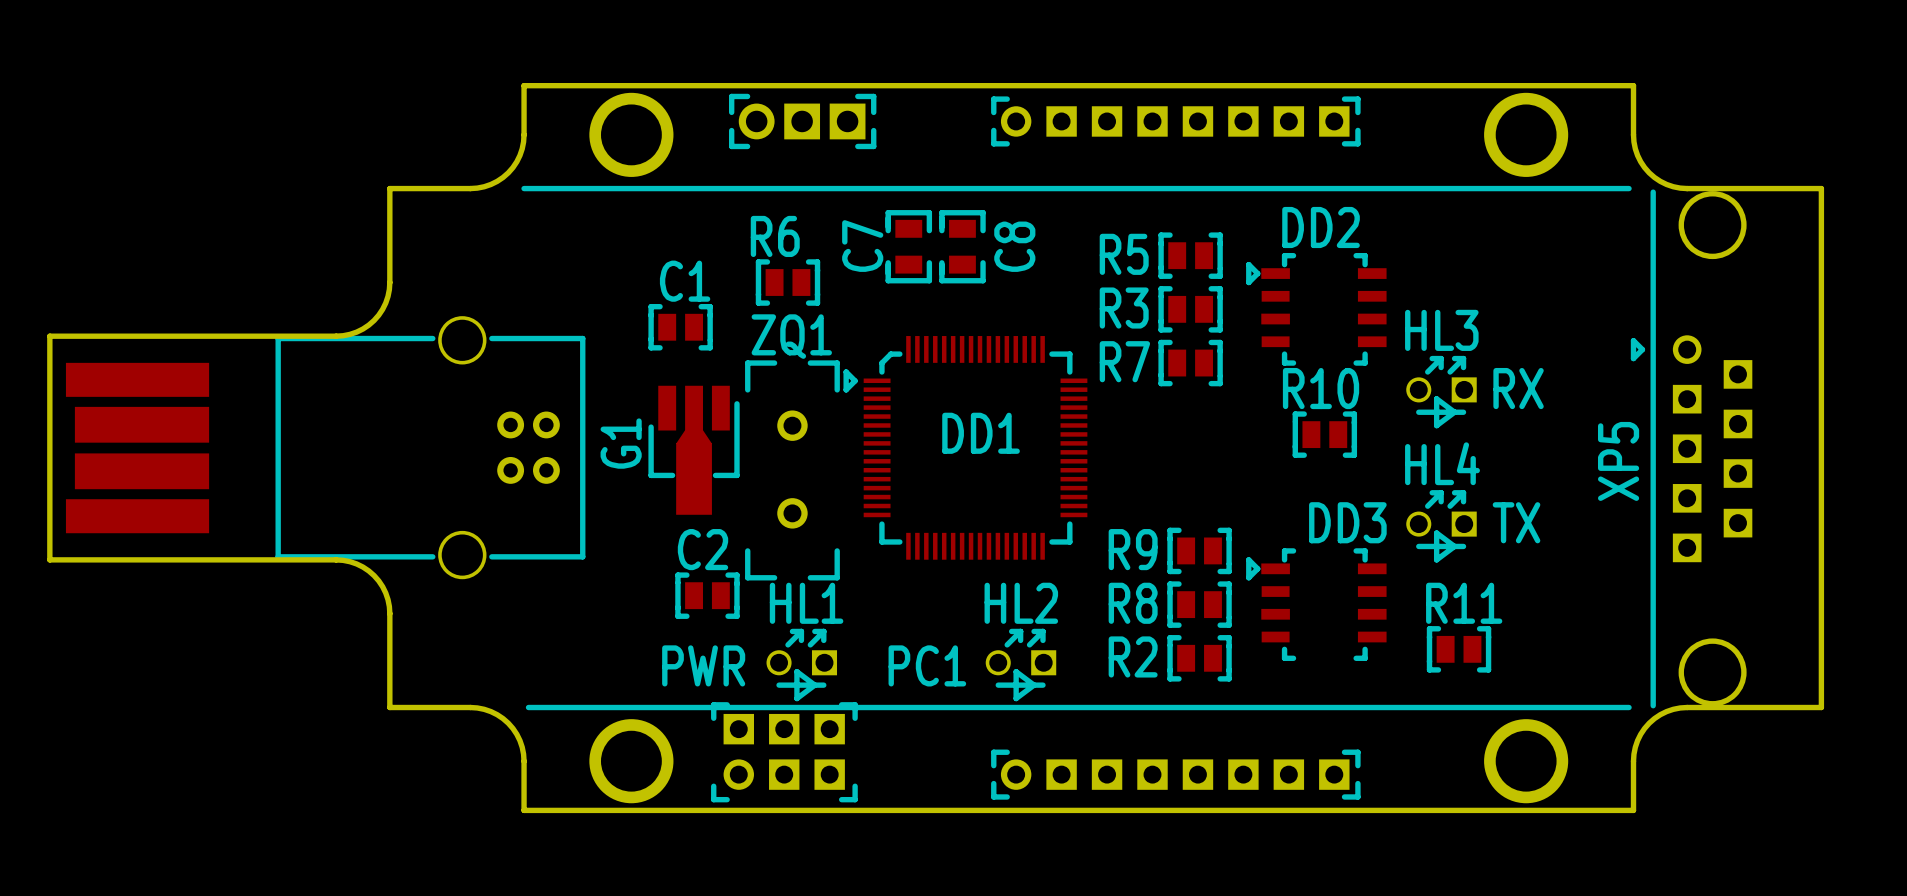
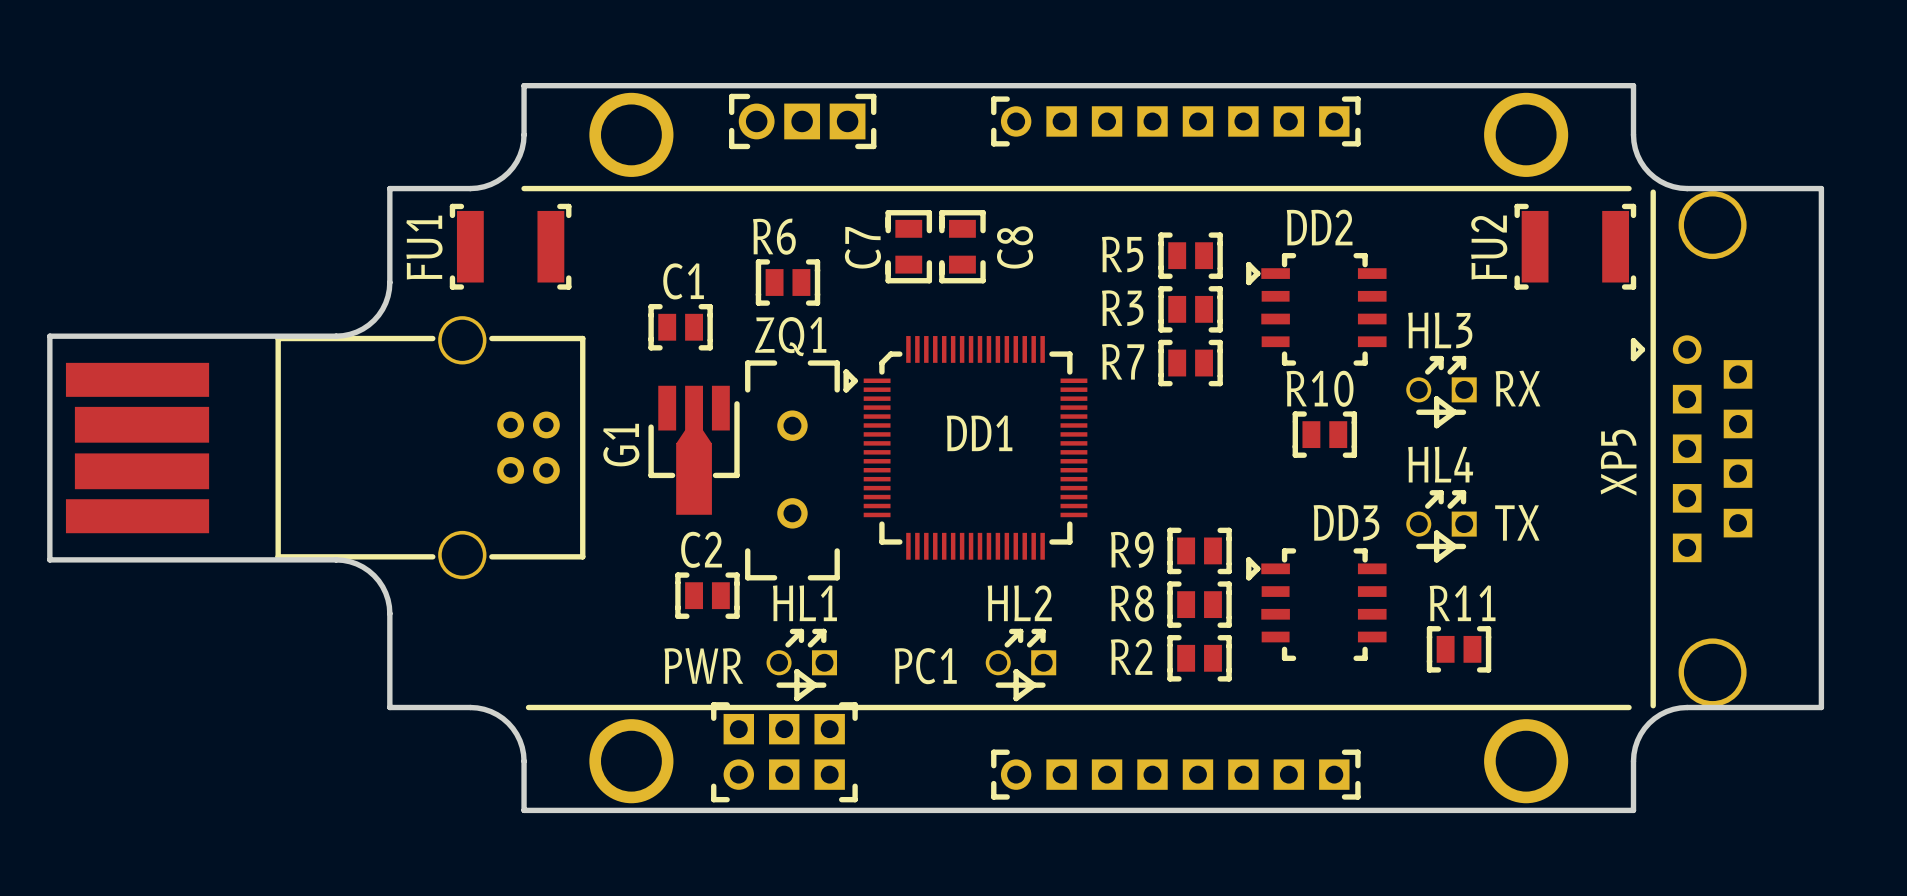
FU1: none -> (510, 246)
FU2: none -> (1575, 246)

